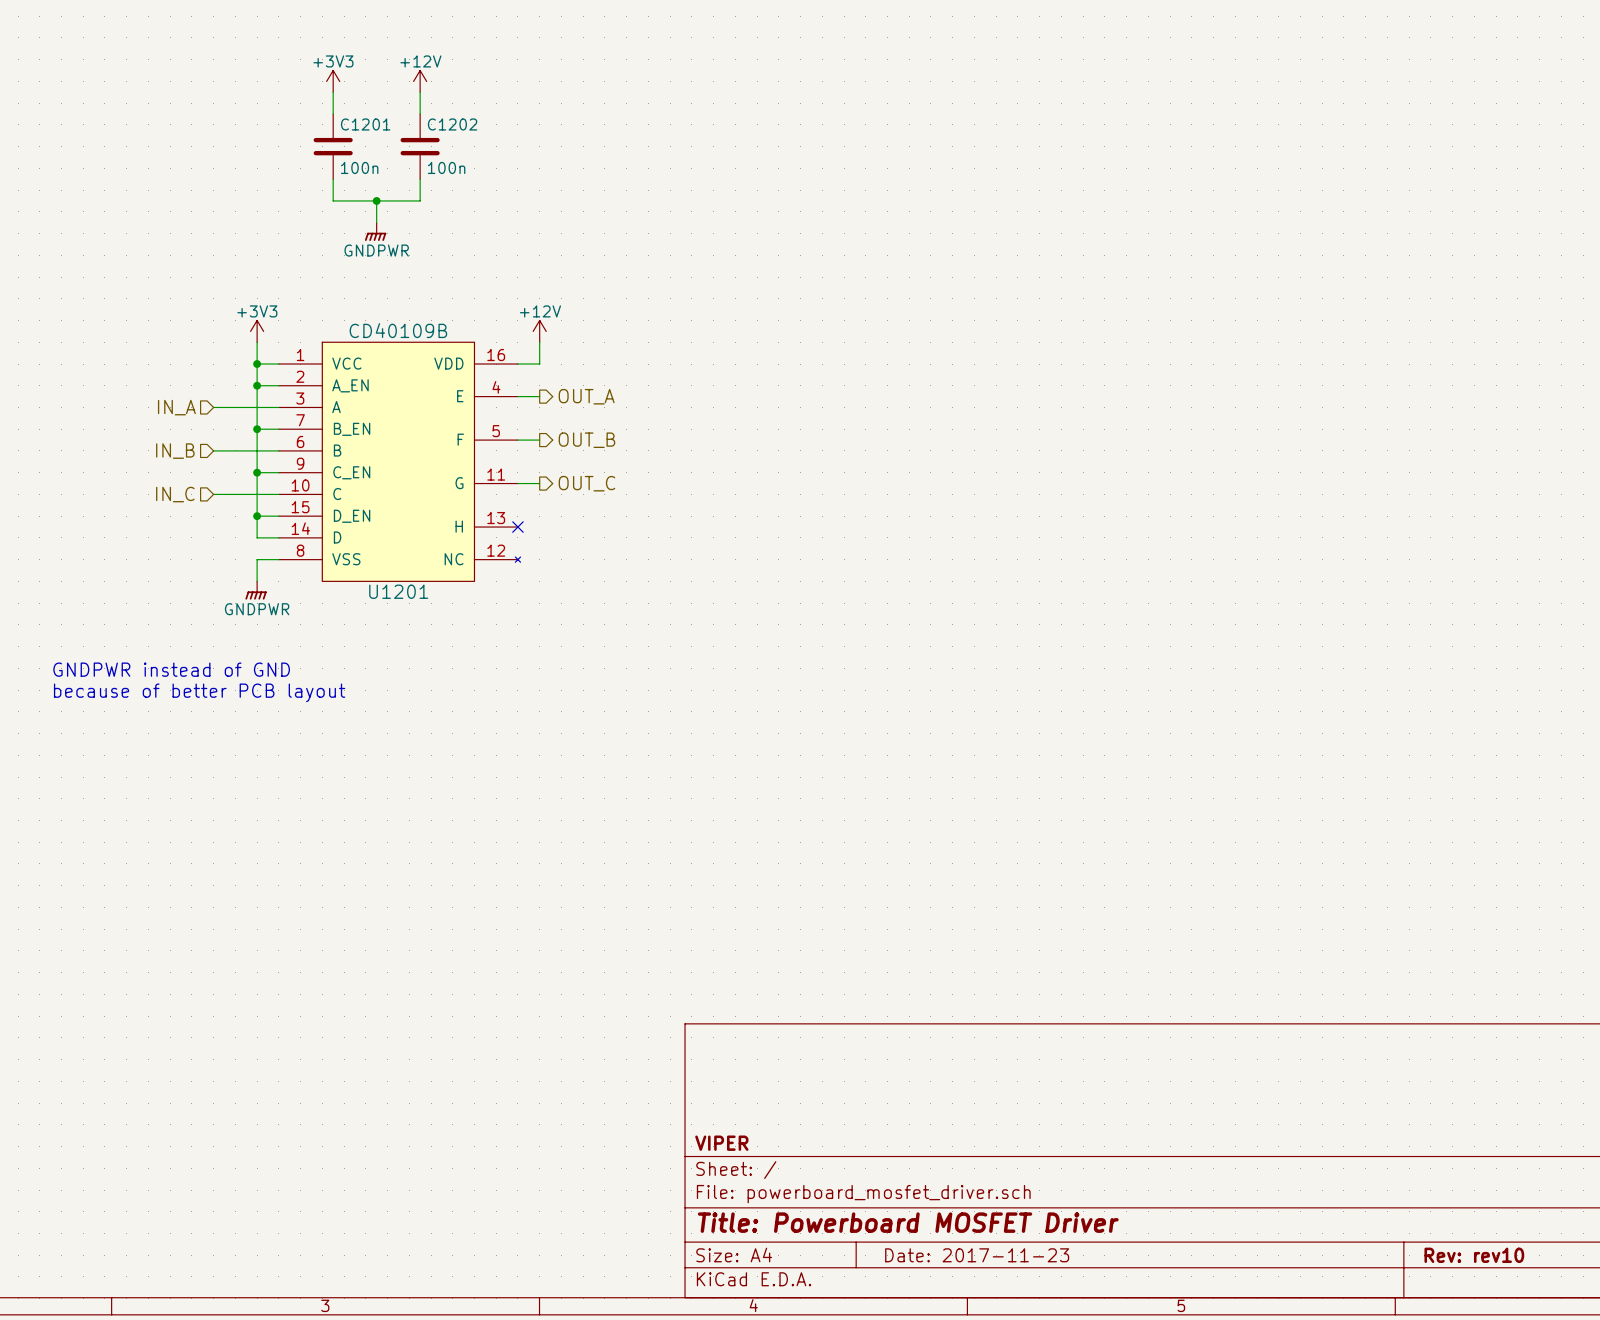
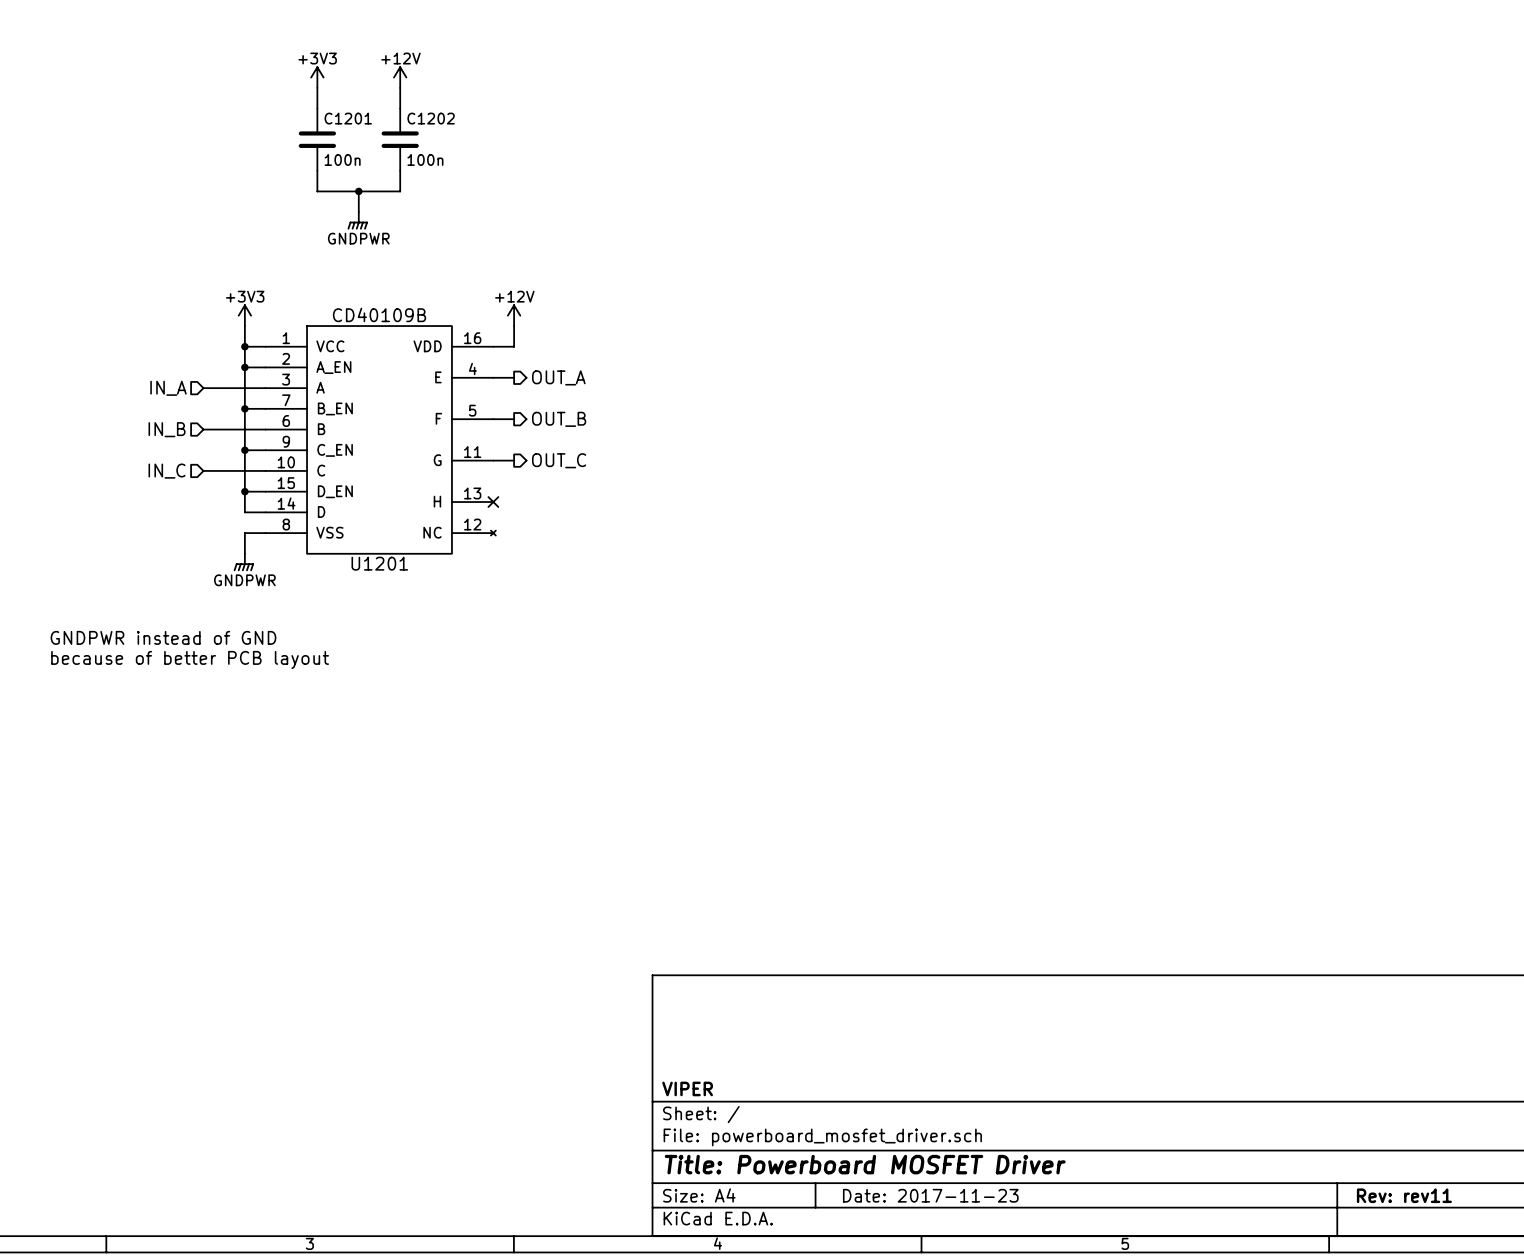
title block: Rev: rev10 (1474, 1255) -> Rev: rev11 (1404, 1195)

